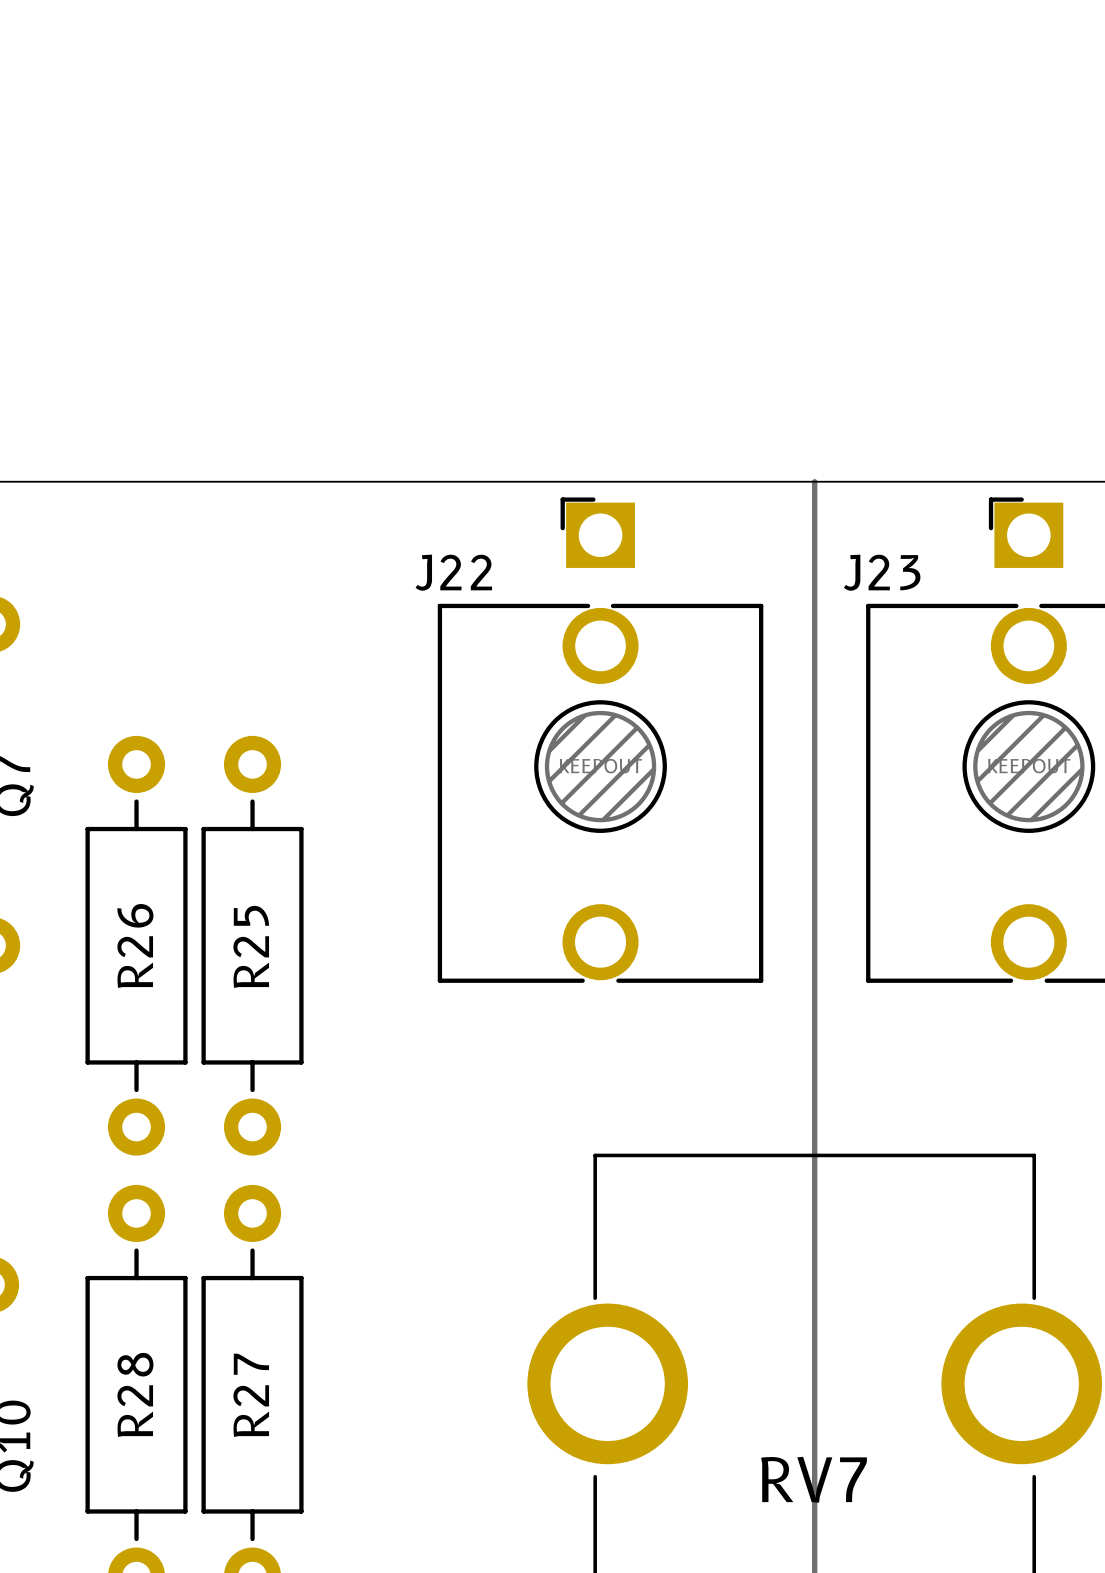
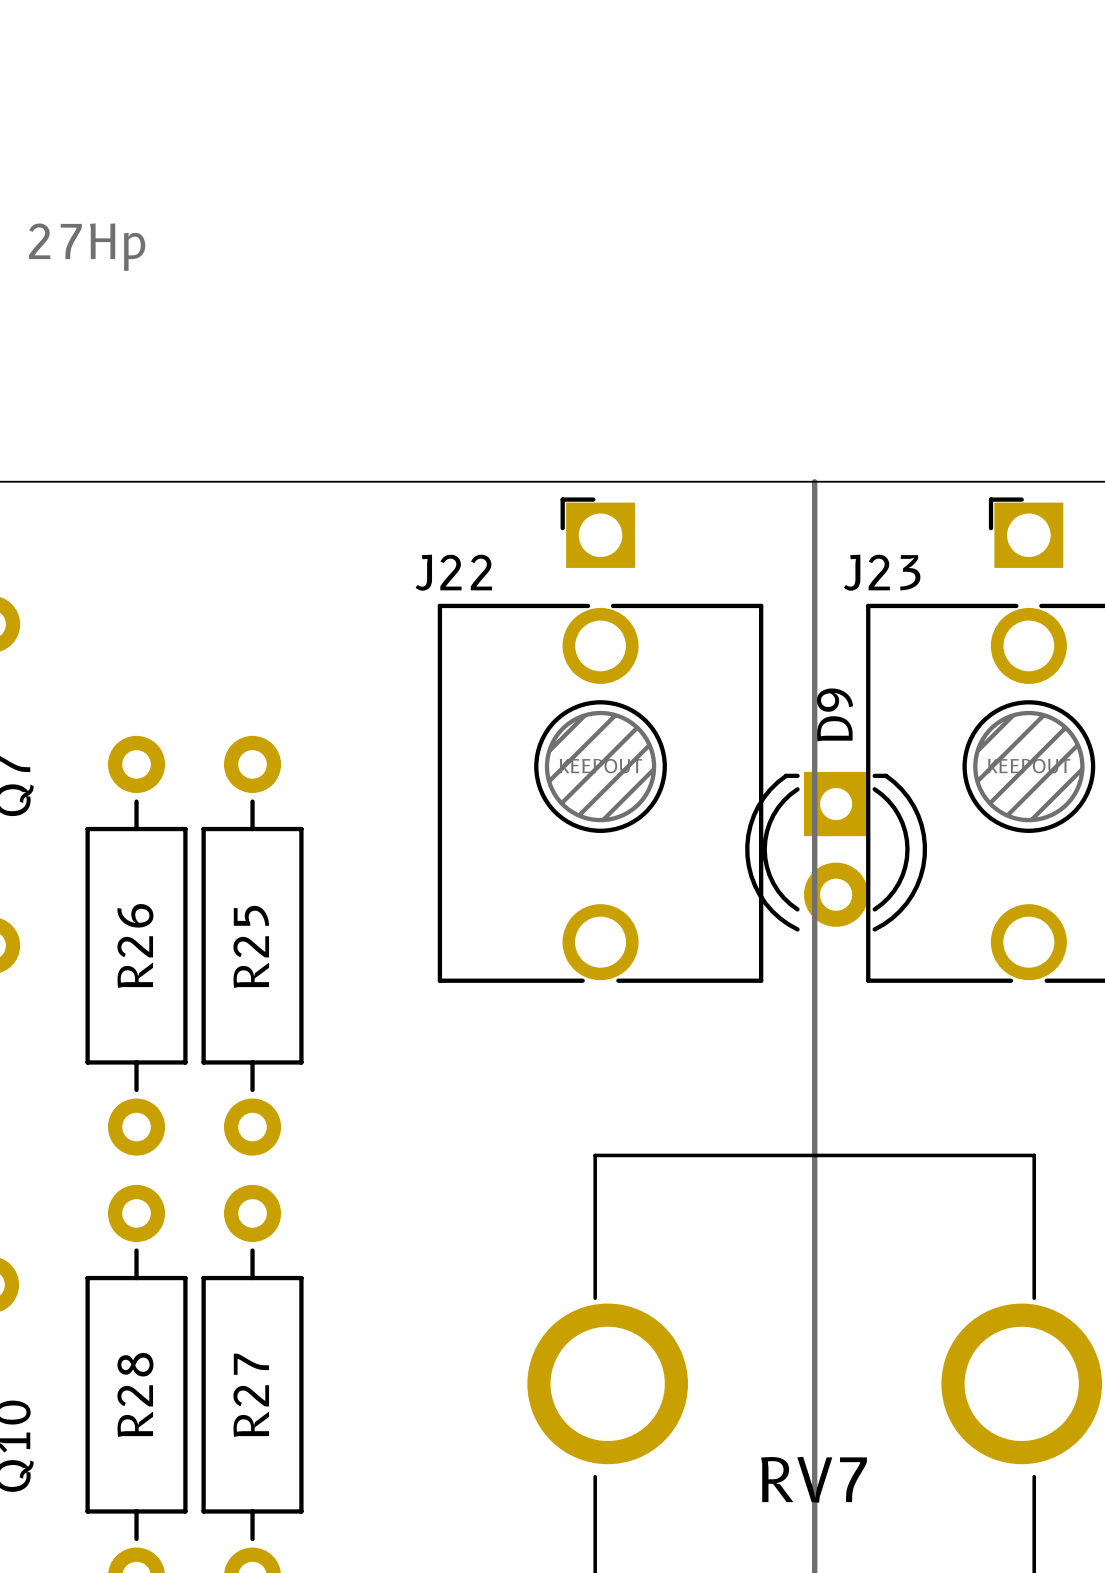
text: none -> 27Hp (87, 247)
D9: none -> (836, 851)

